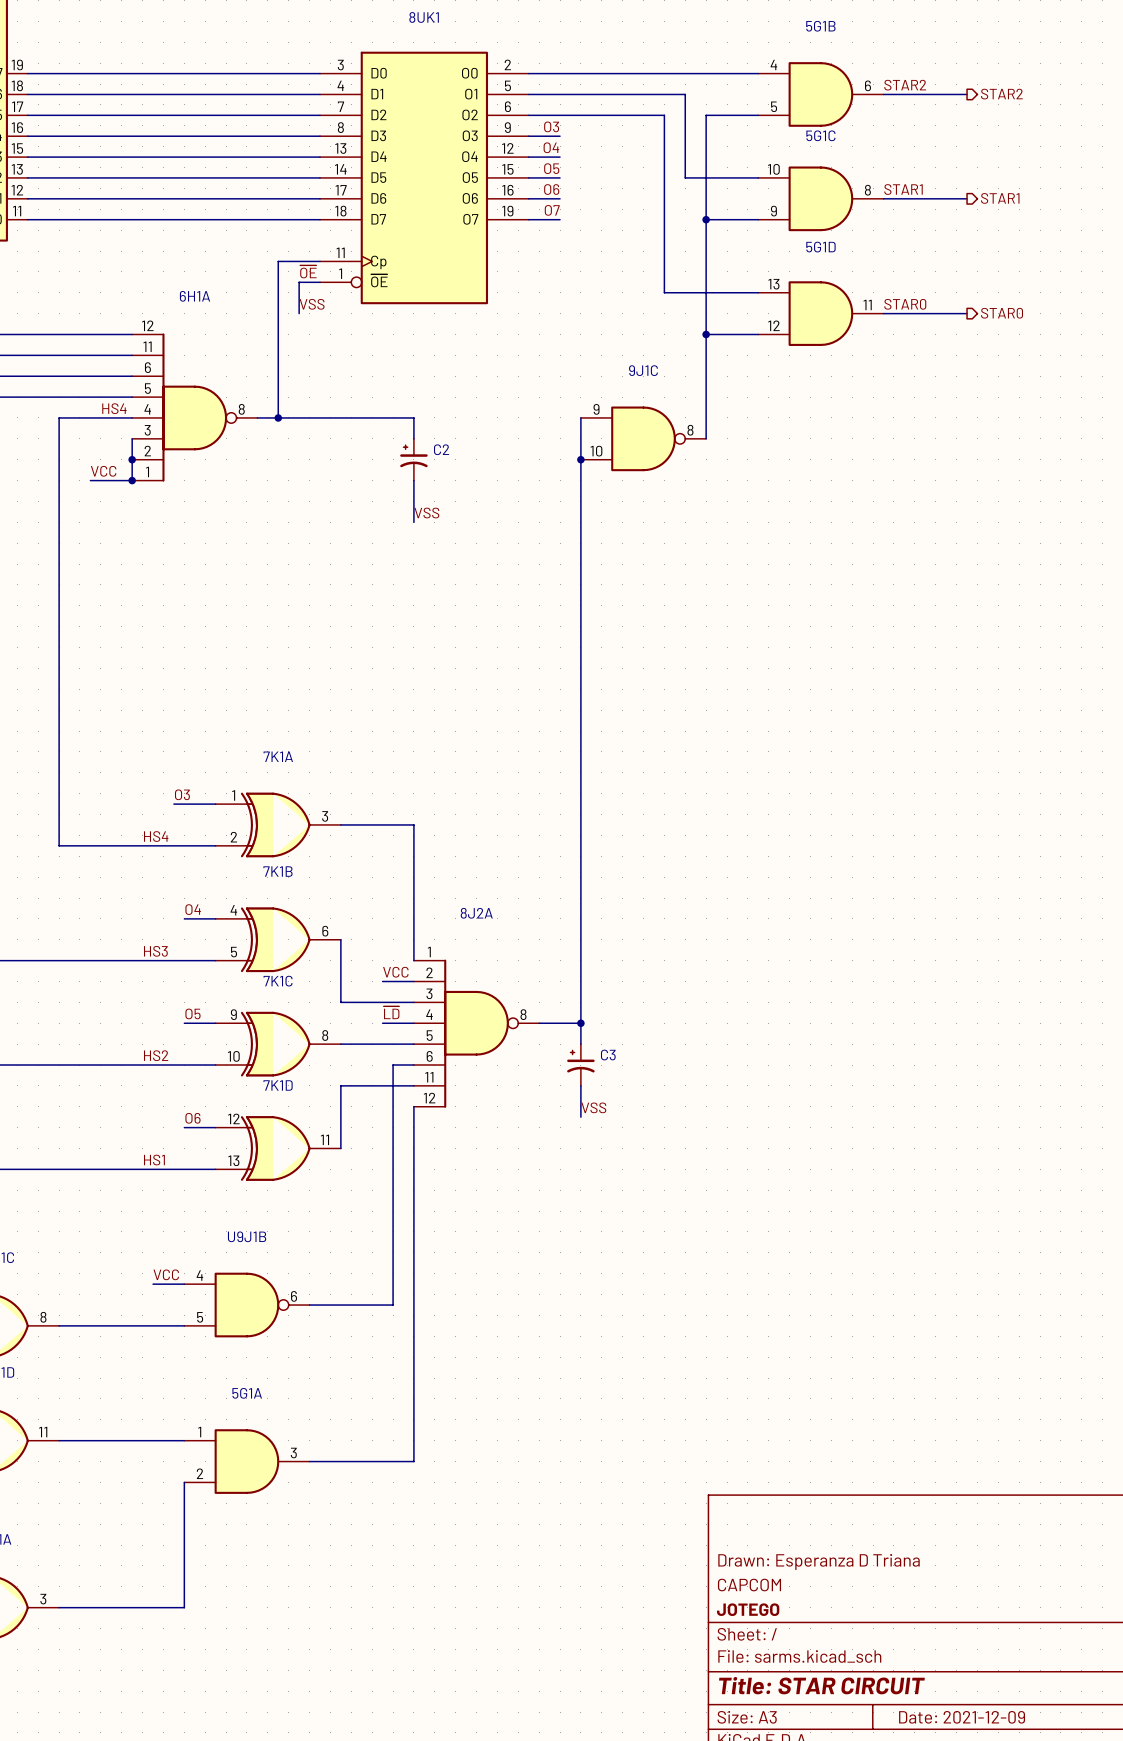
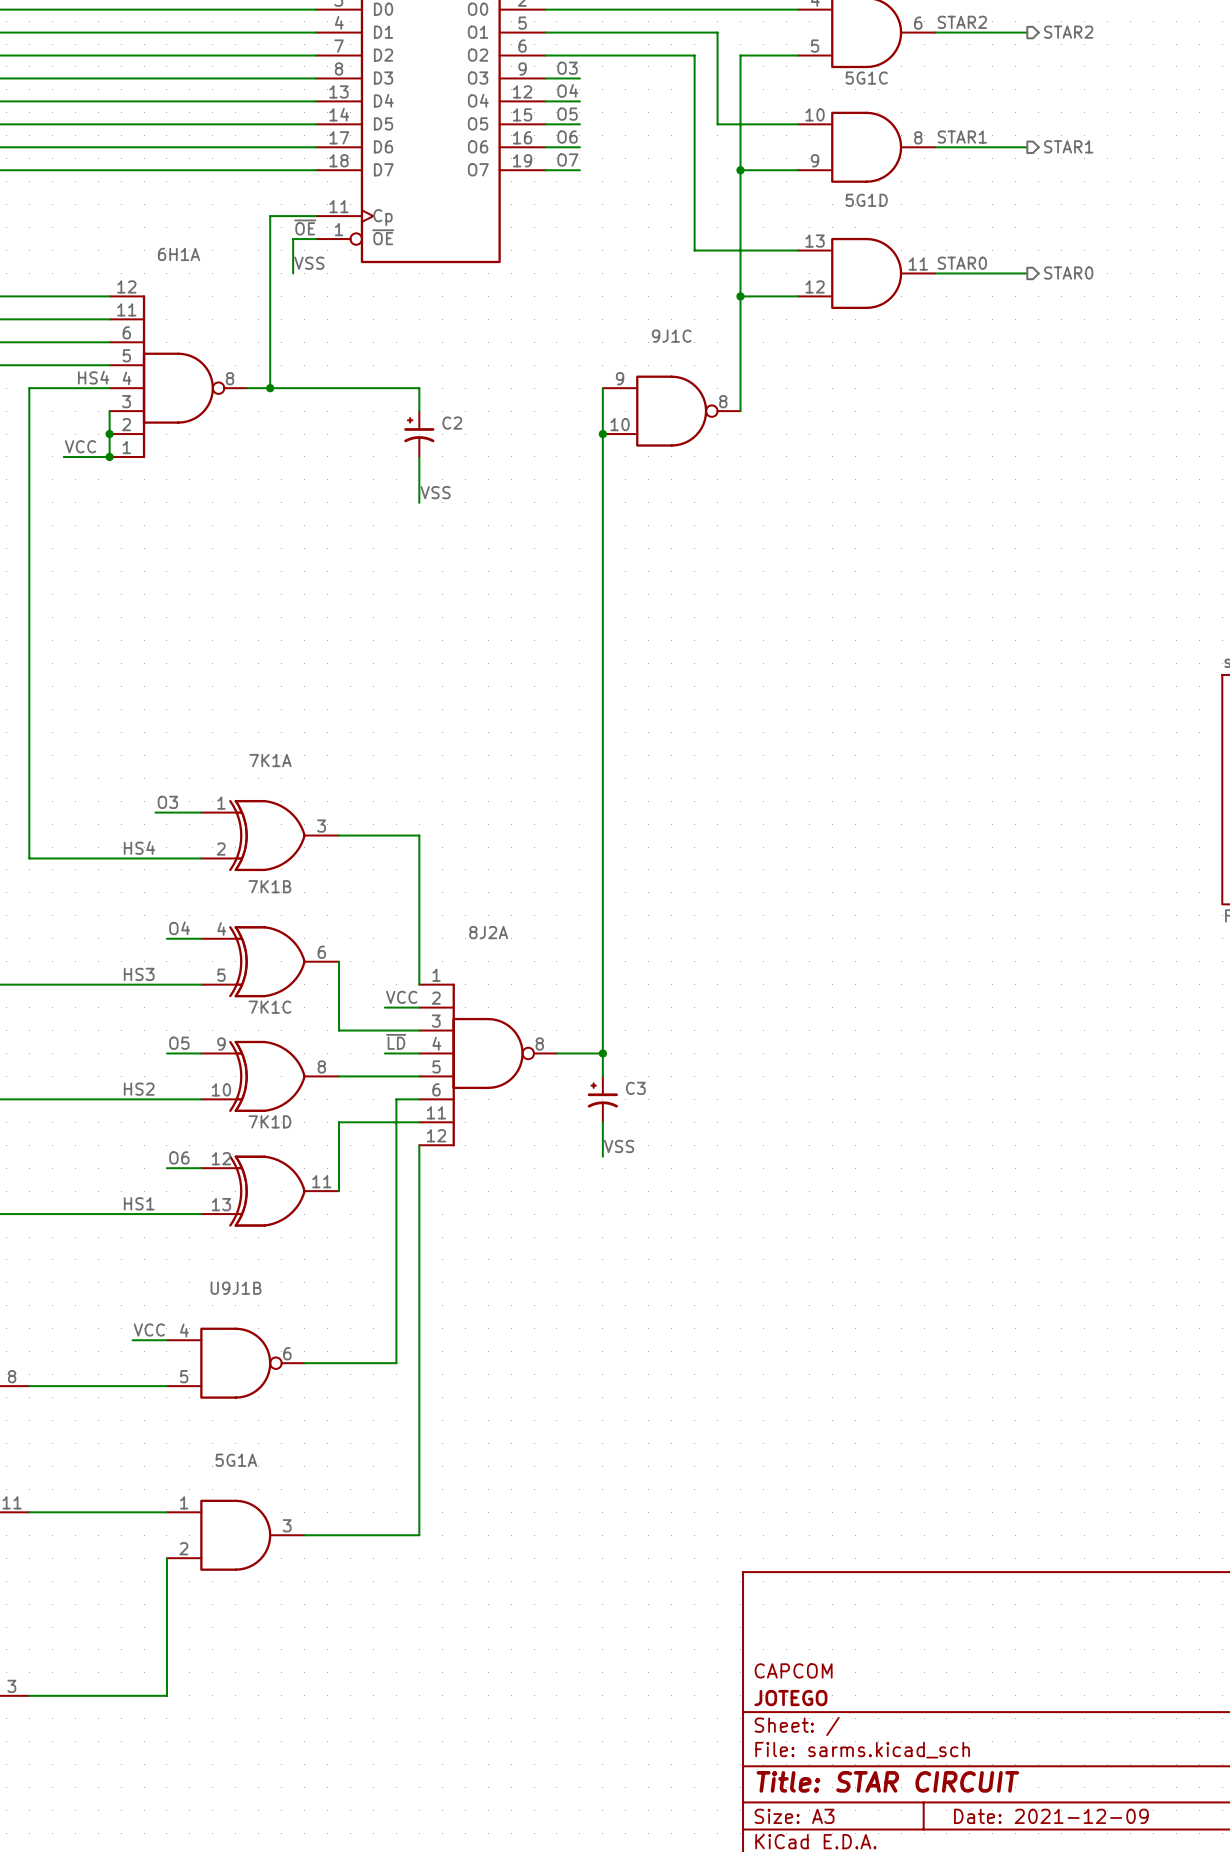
title block: Drawn: Esperanza D Triana (819, 1561) -> none

